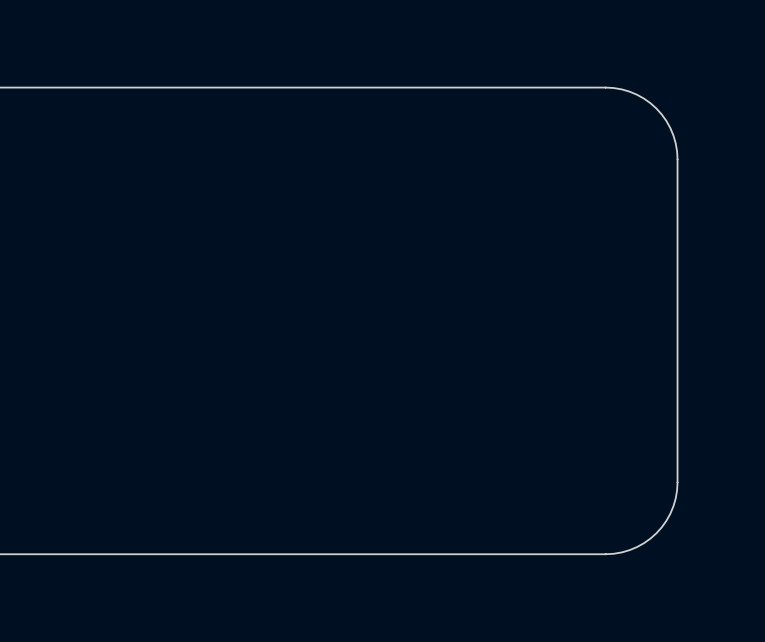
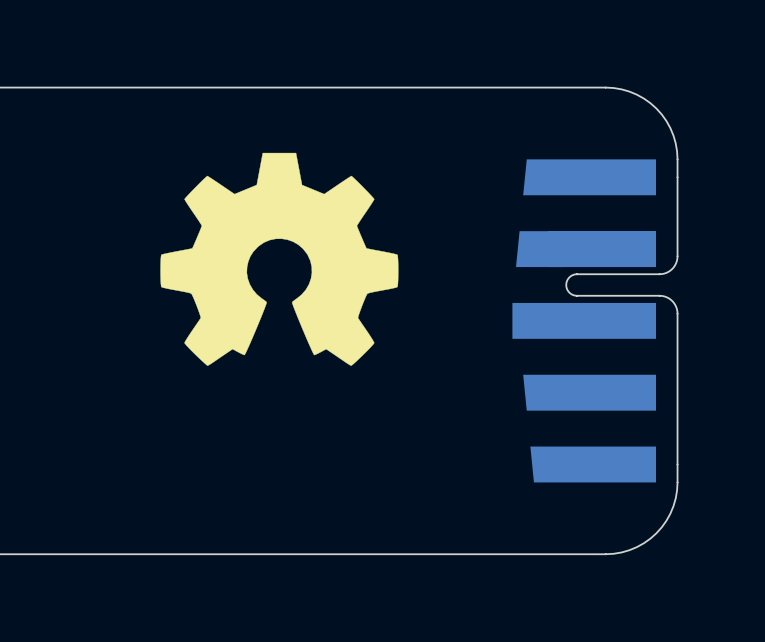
drawing: none -> [160, 152, 399, 366]
board edge: (677, 177) (677, 464) -> none
part: none -> (595, 320)

